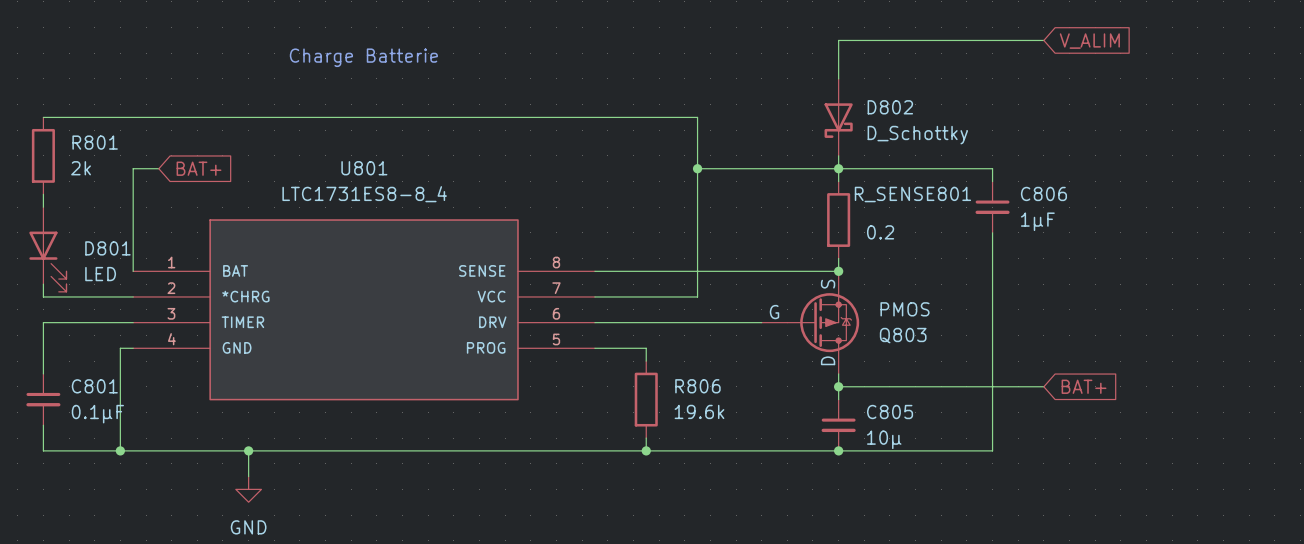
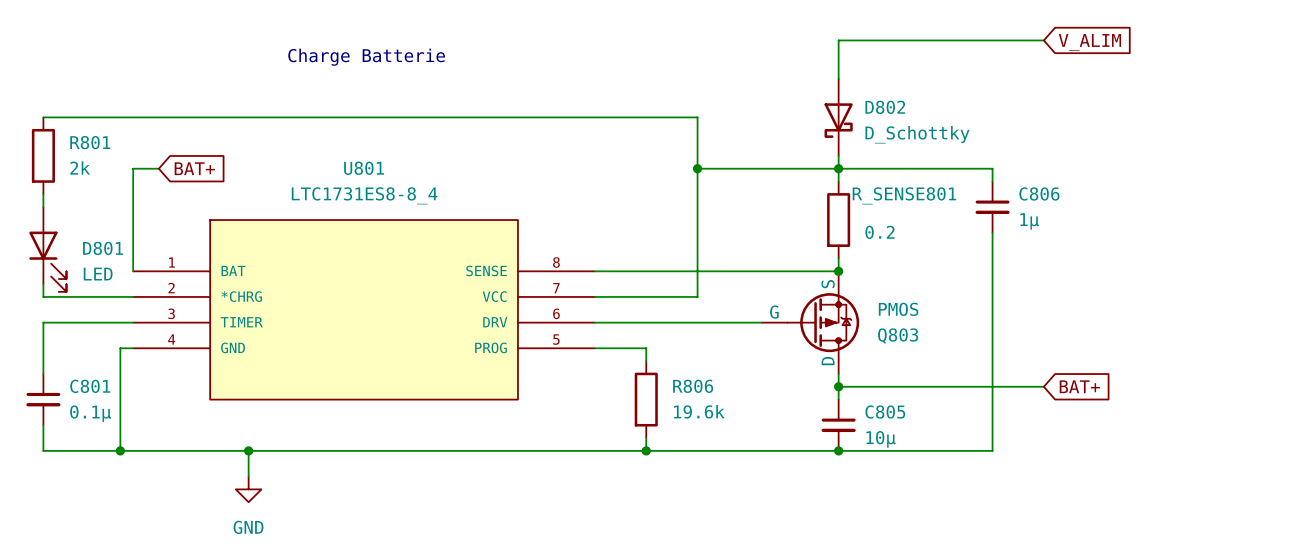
C806 value: 1µF (1037, 221) -> 1µ (1029, 221)
C801 value: 0.1µF (97, 414) -> 0.1µ (90, 413)

